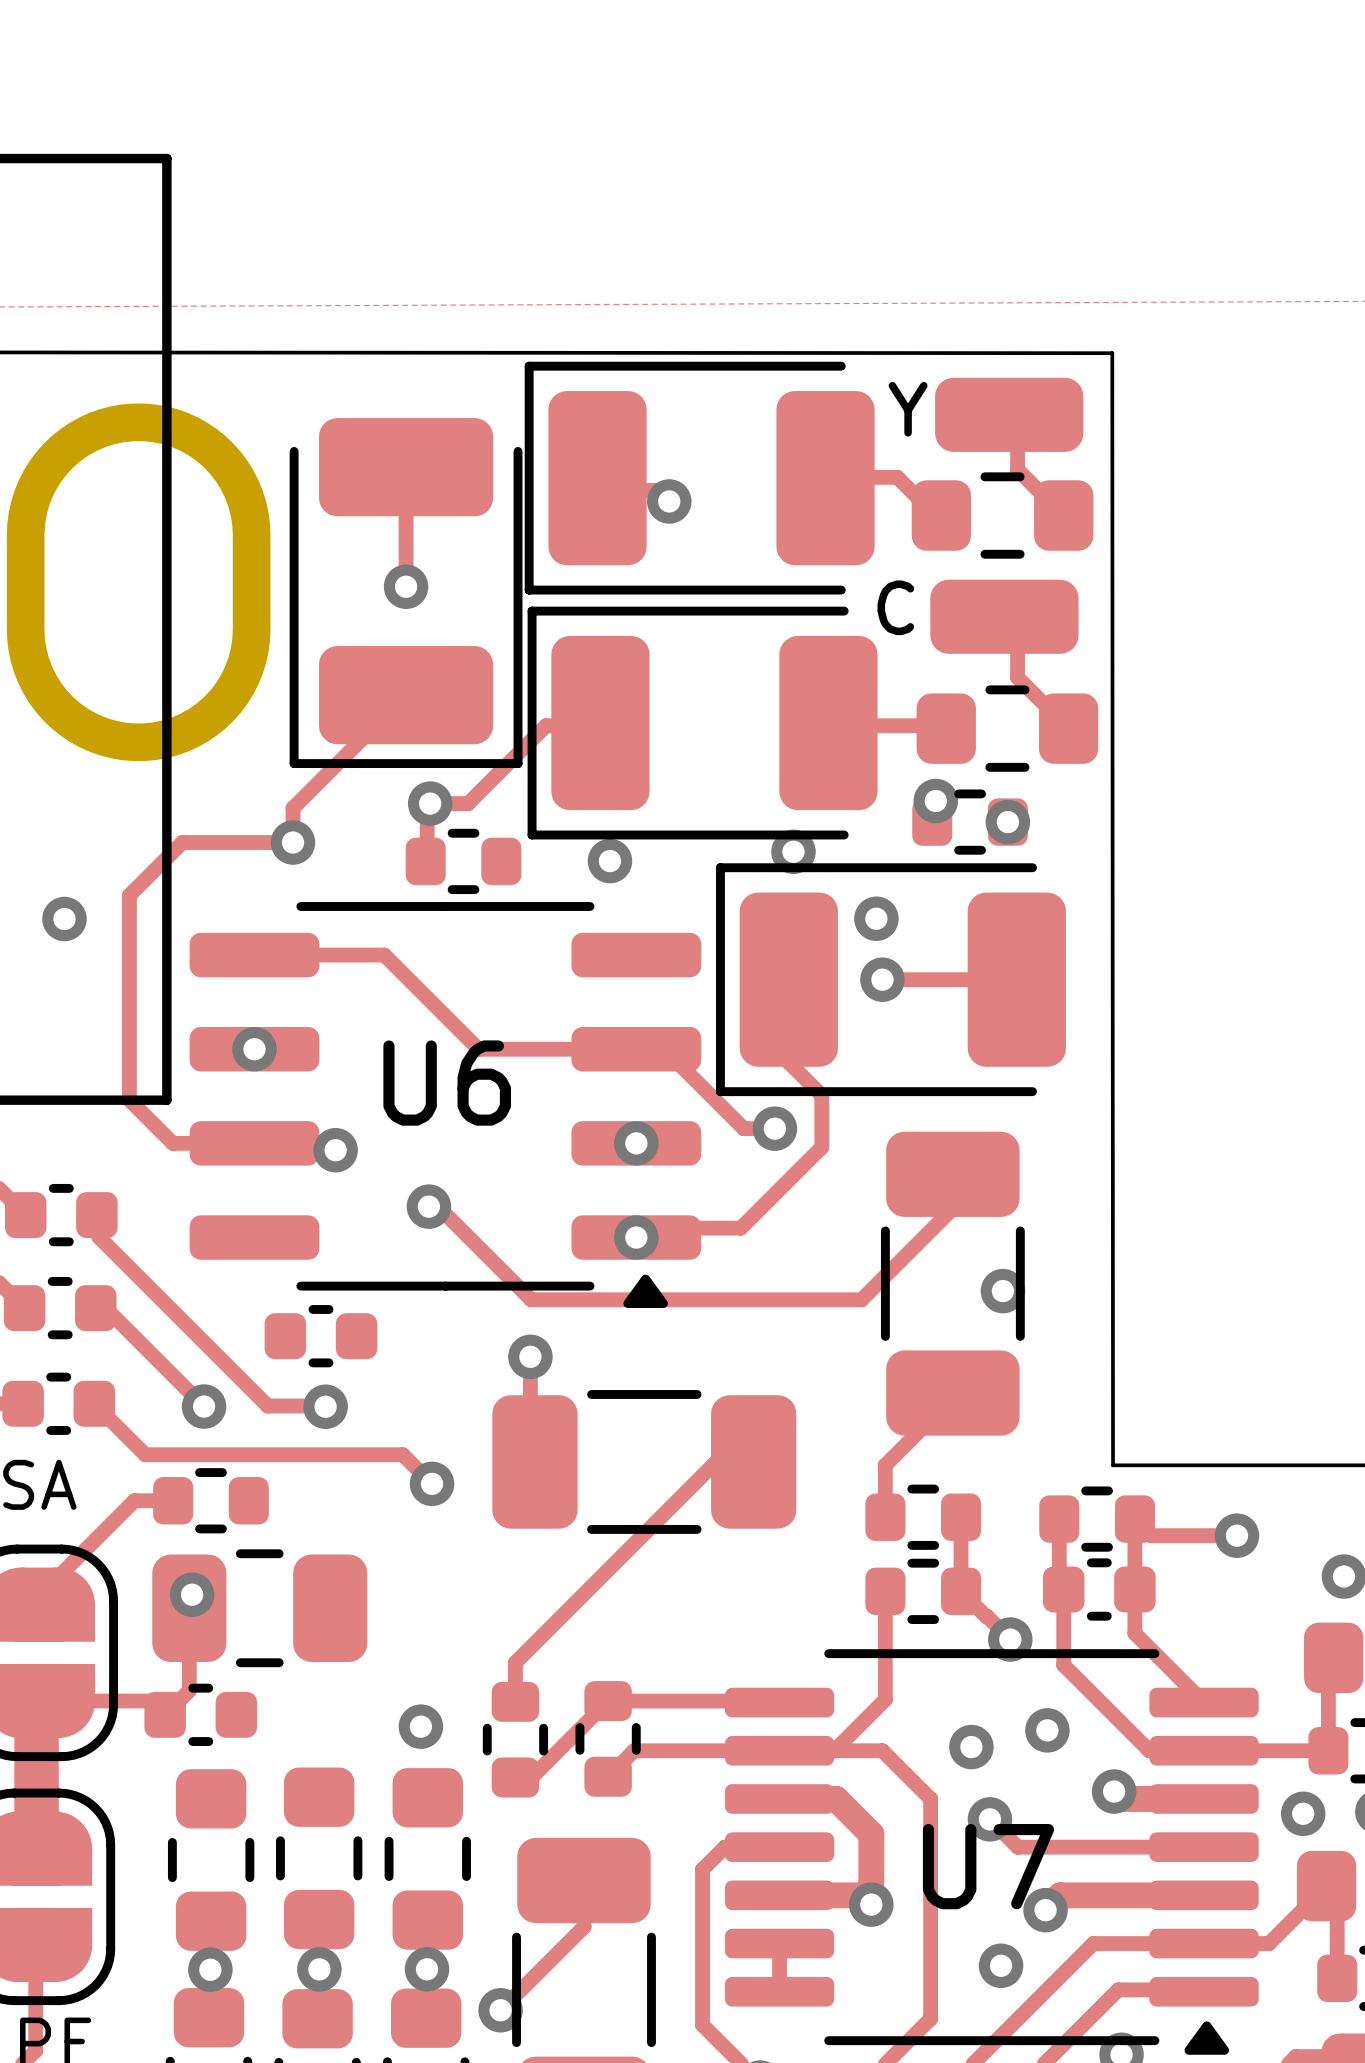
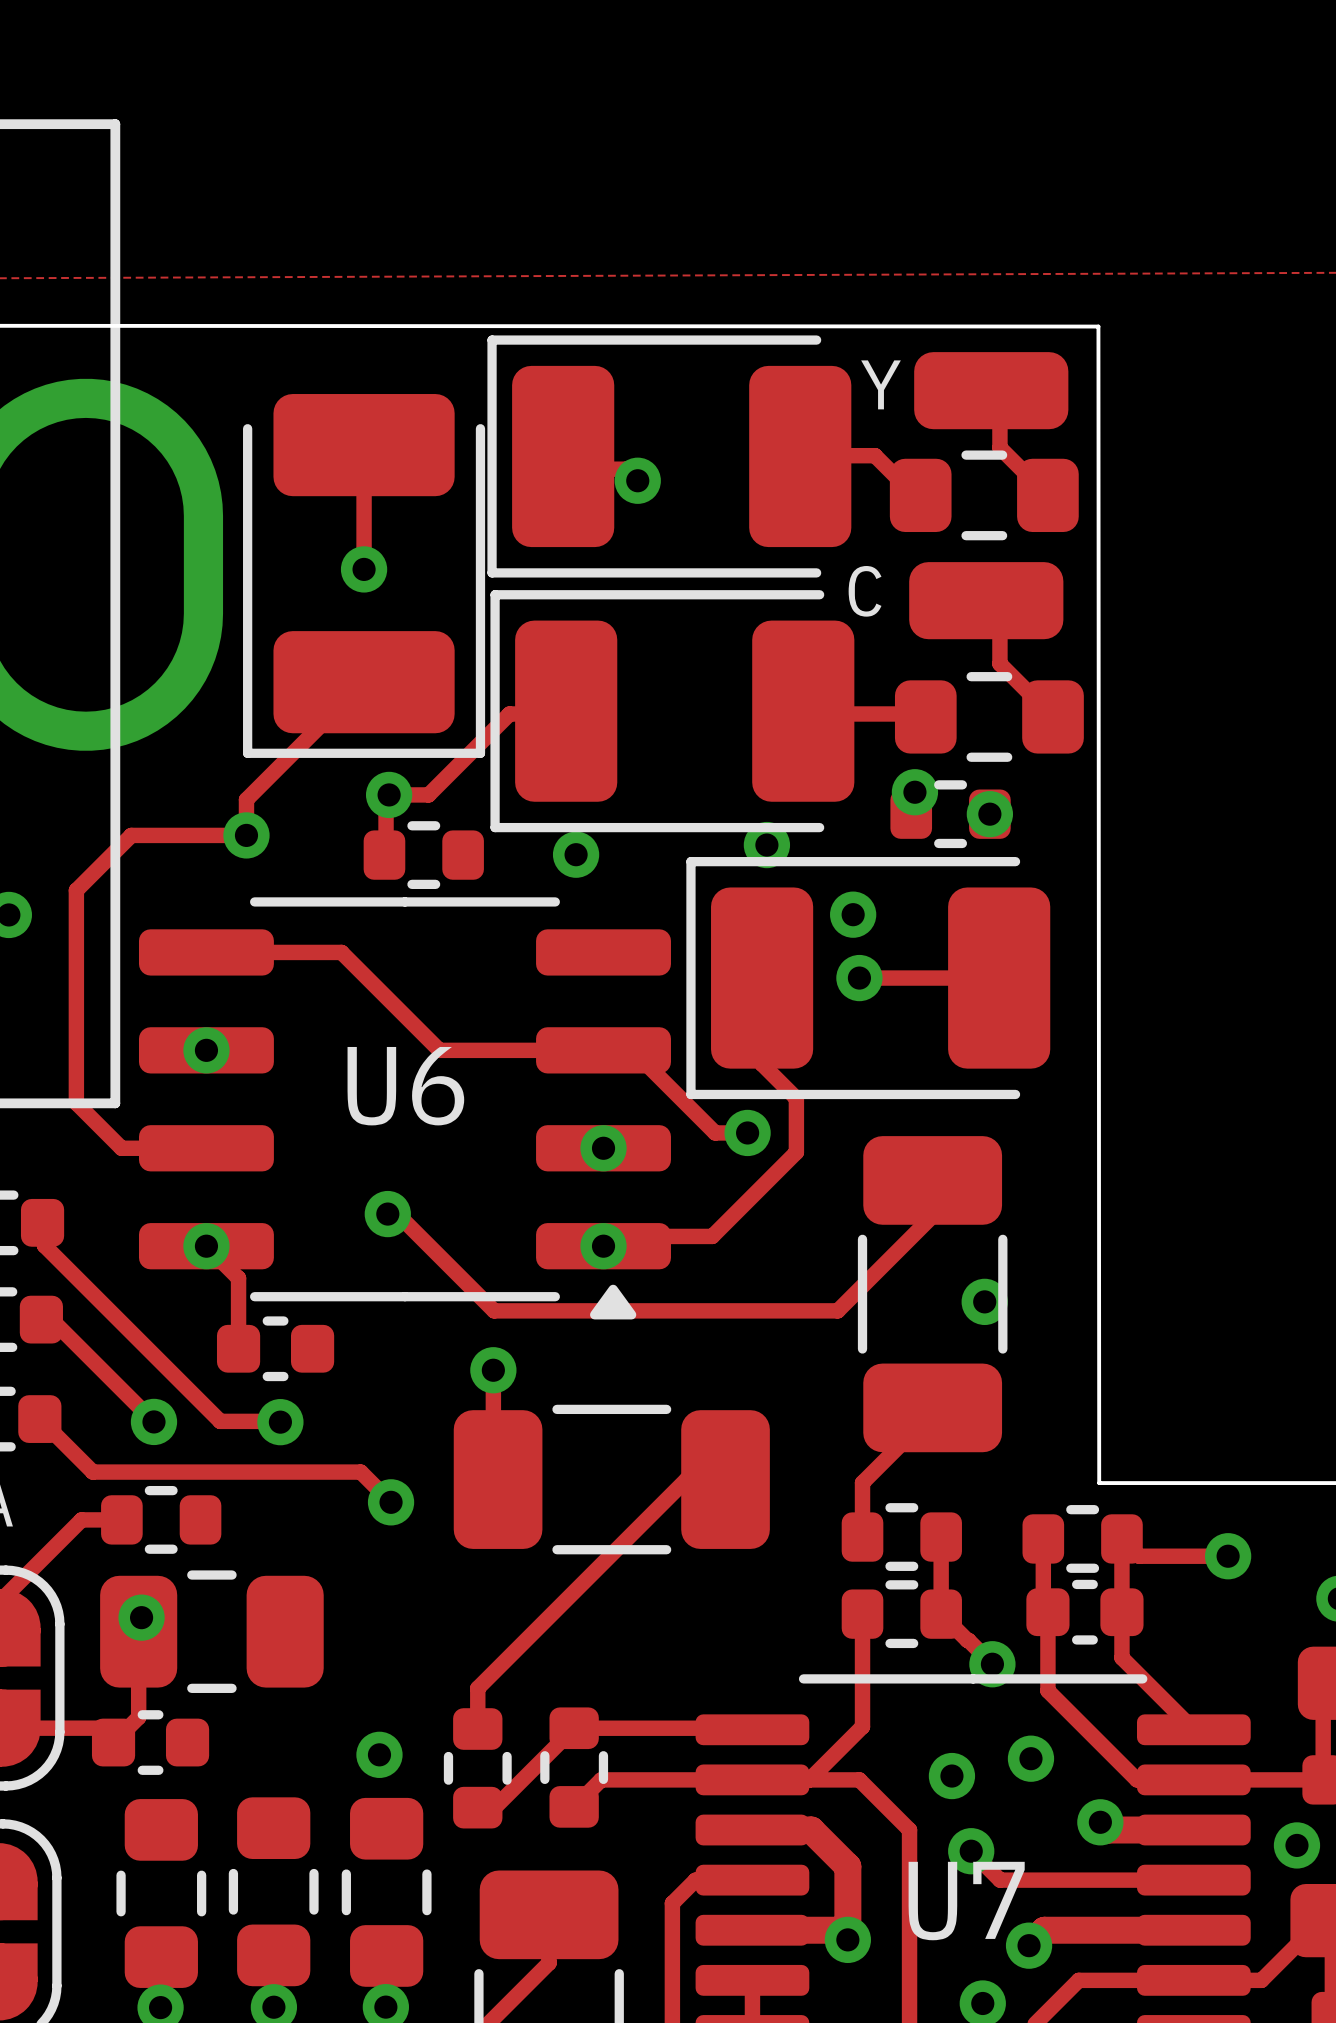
via position: (335, 1150) -> (206, 1246)
track: none -> (206, 1246) (238, 1278) (238, 1348)

